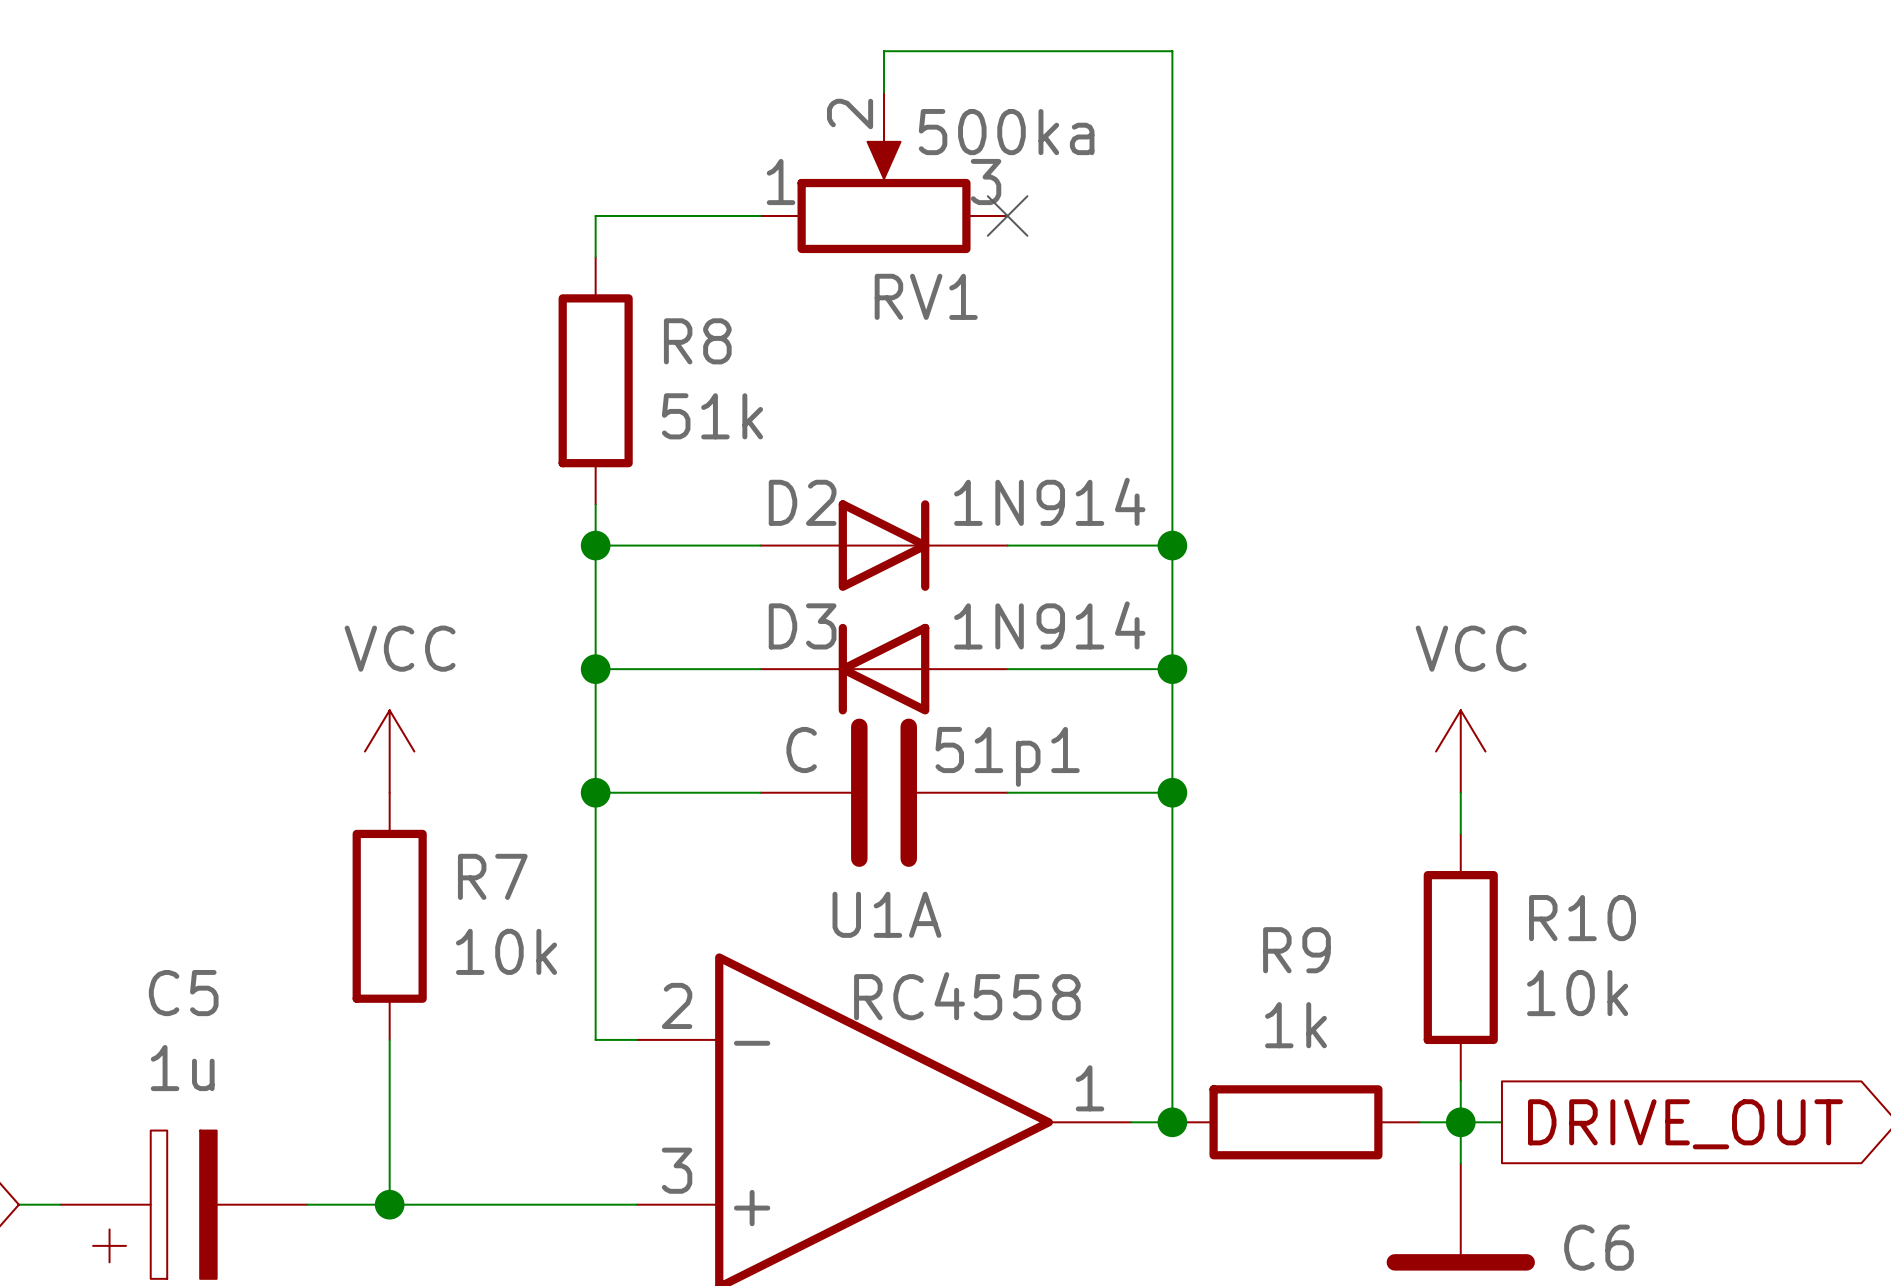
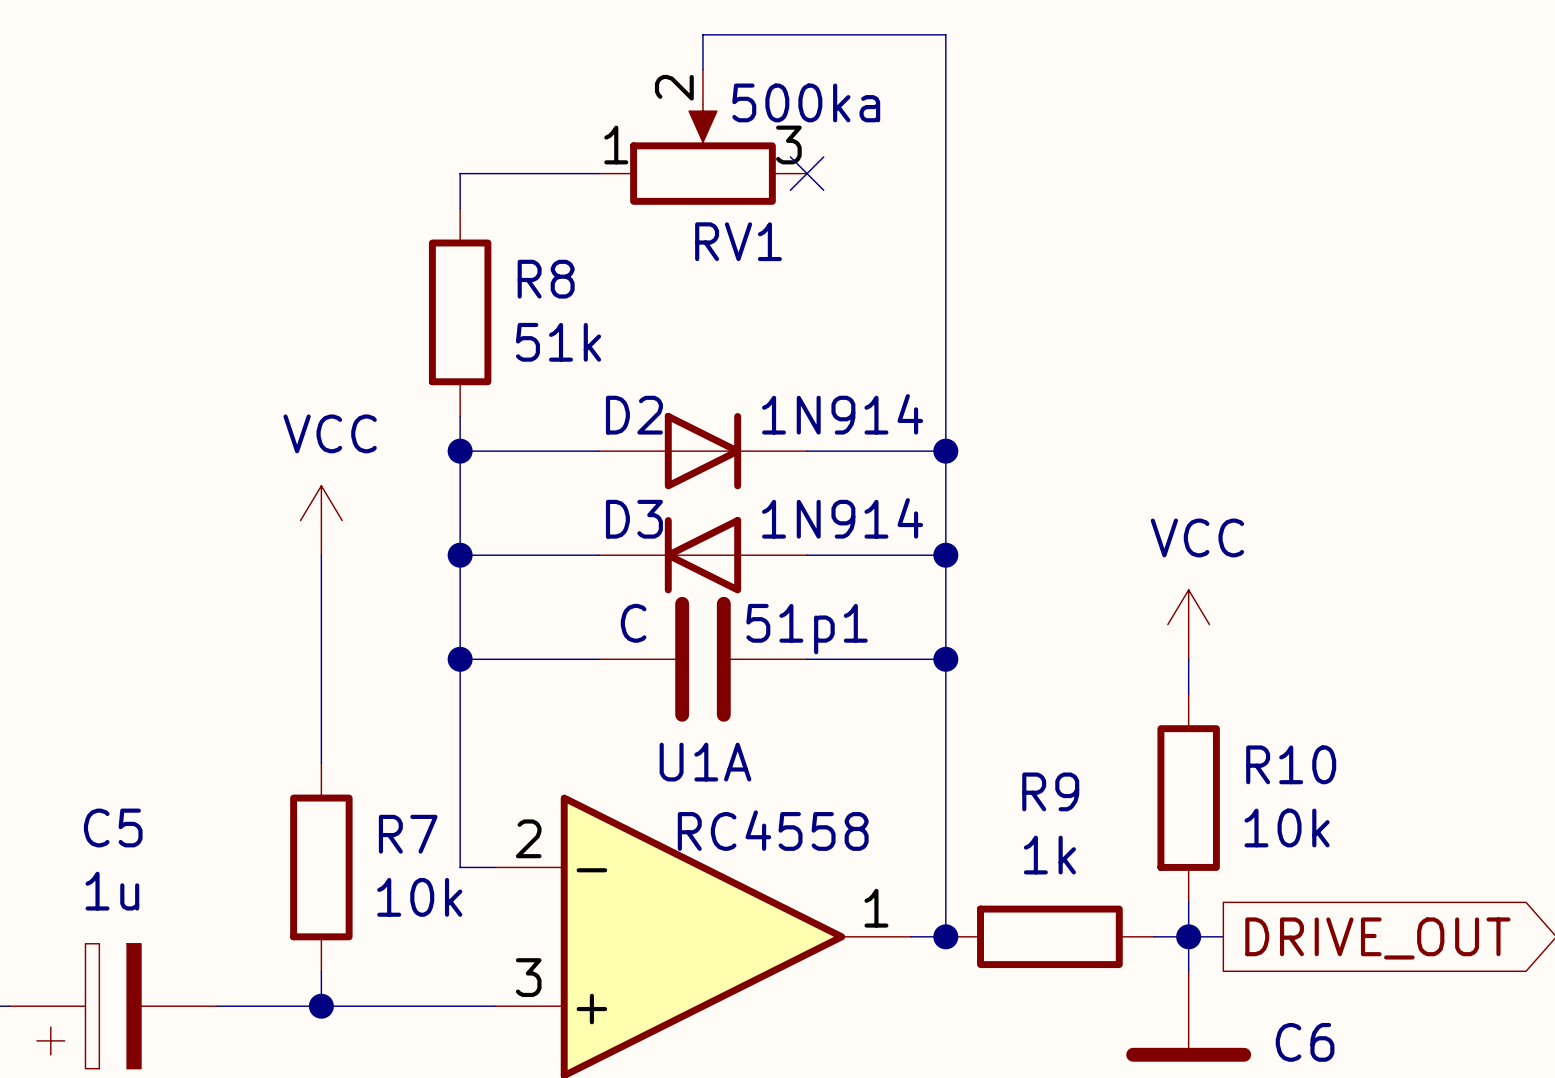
wire: none -> (321, 555) (321, 763)
power symbol position: VCC (389, 751) -> VCC (321, 520)
R7 position: (389, 916) -> (321, 867)
wire: (389, 1039) (389, 1204) -> none
wire: none -> (321, 971) (321, 1006)
junction position: (389, 1204) -> (321, 1006)

